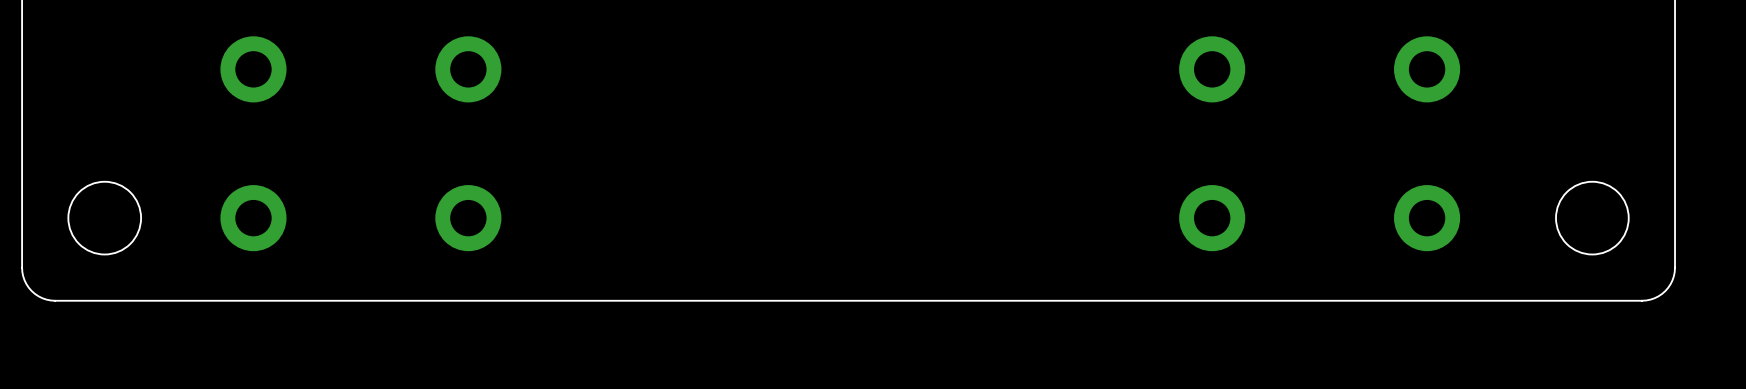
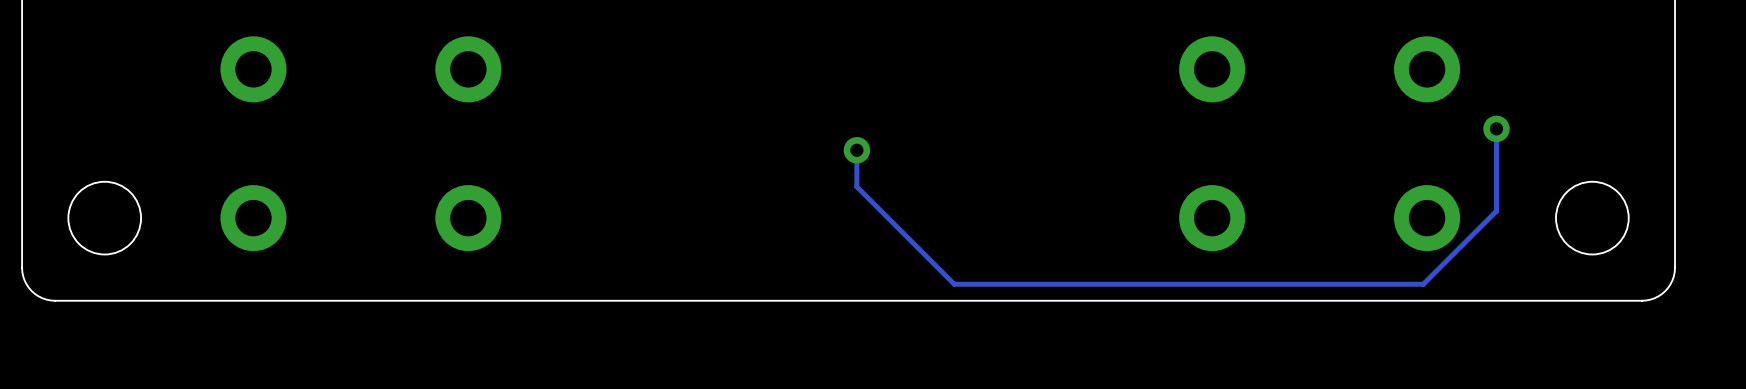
track: none -> (1496, 128) (1496, 211) (1423, 284) (954, 284) (856, 186) (856, 150)
via: none -> (1496, 128)
via: none -> (856, 150)

